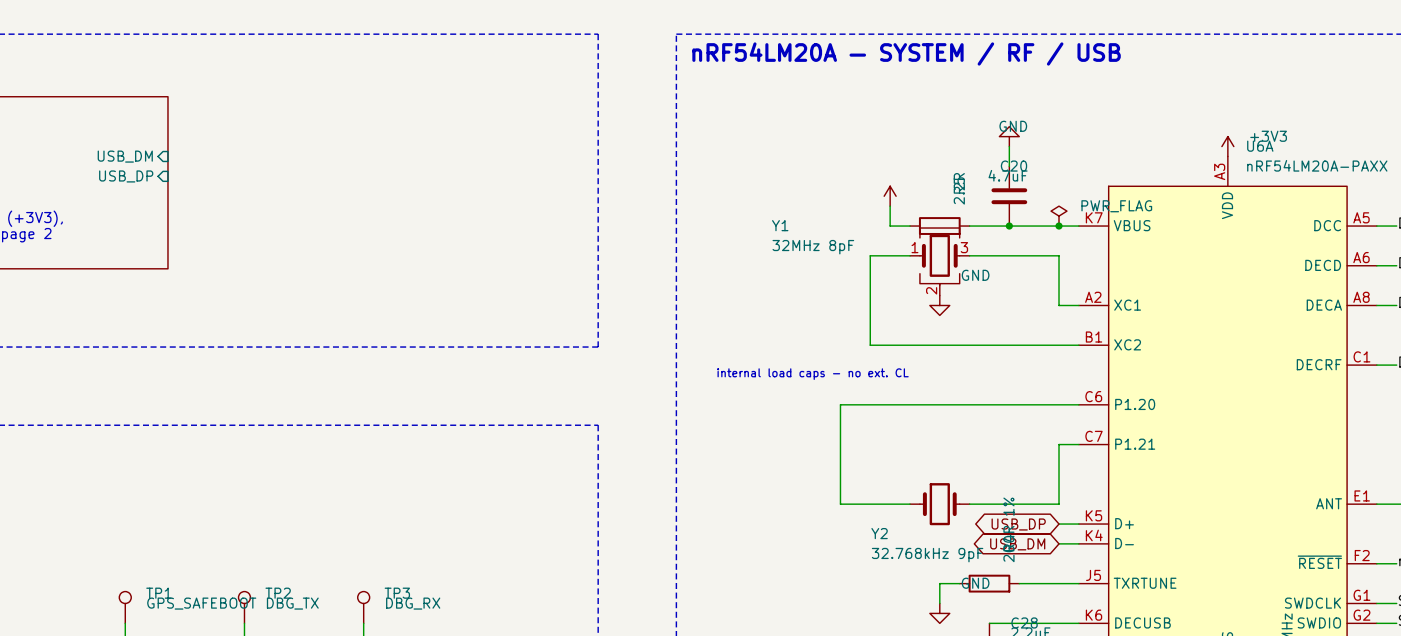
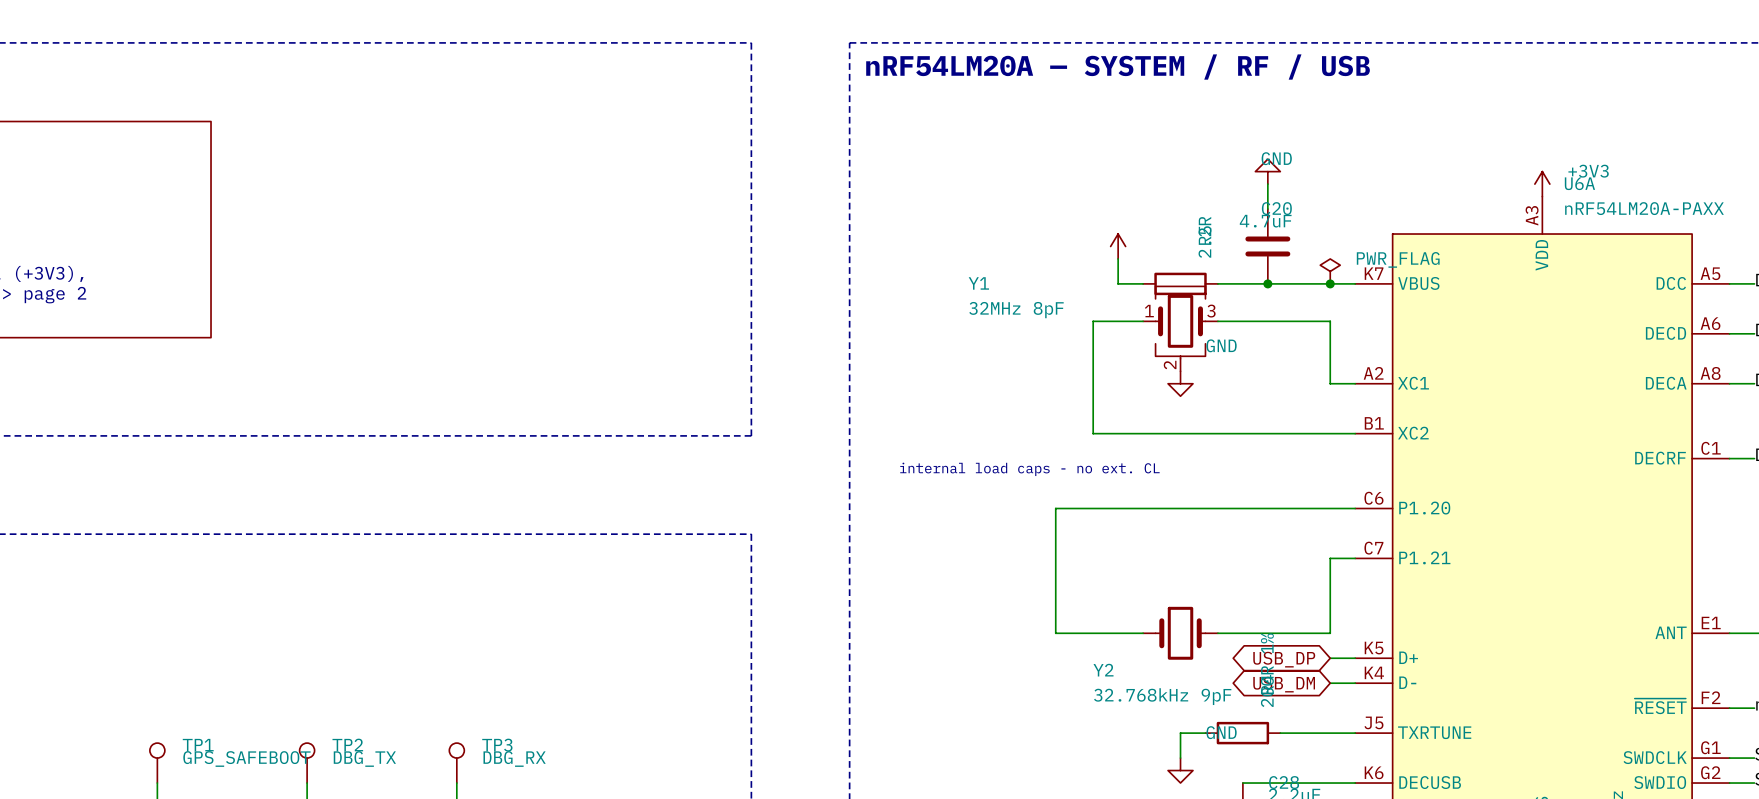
sheet pin: USB_DM (125, 156) -> none
sheet pin: USB_DP (126, 176) -> none

